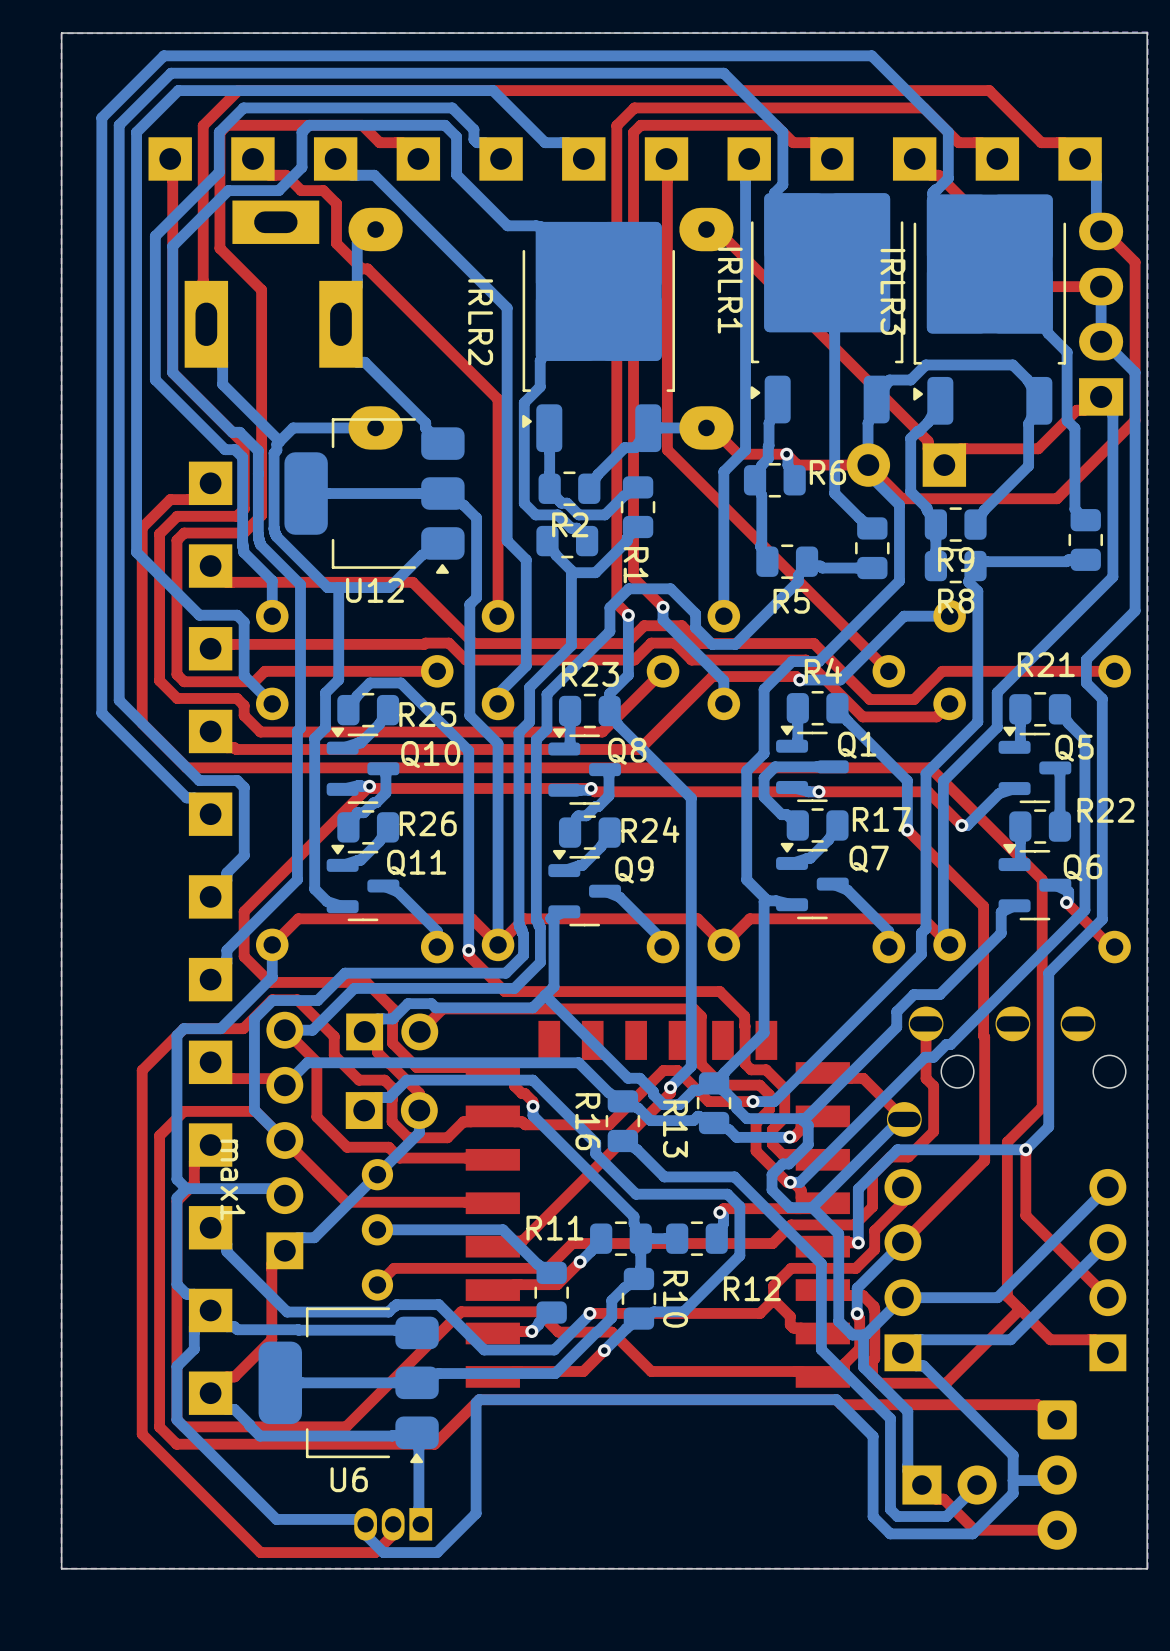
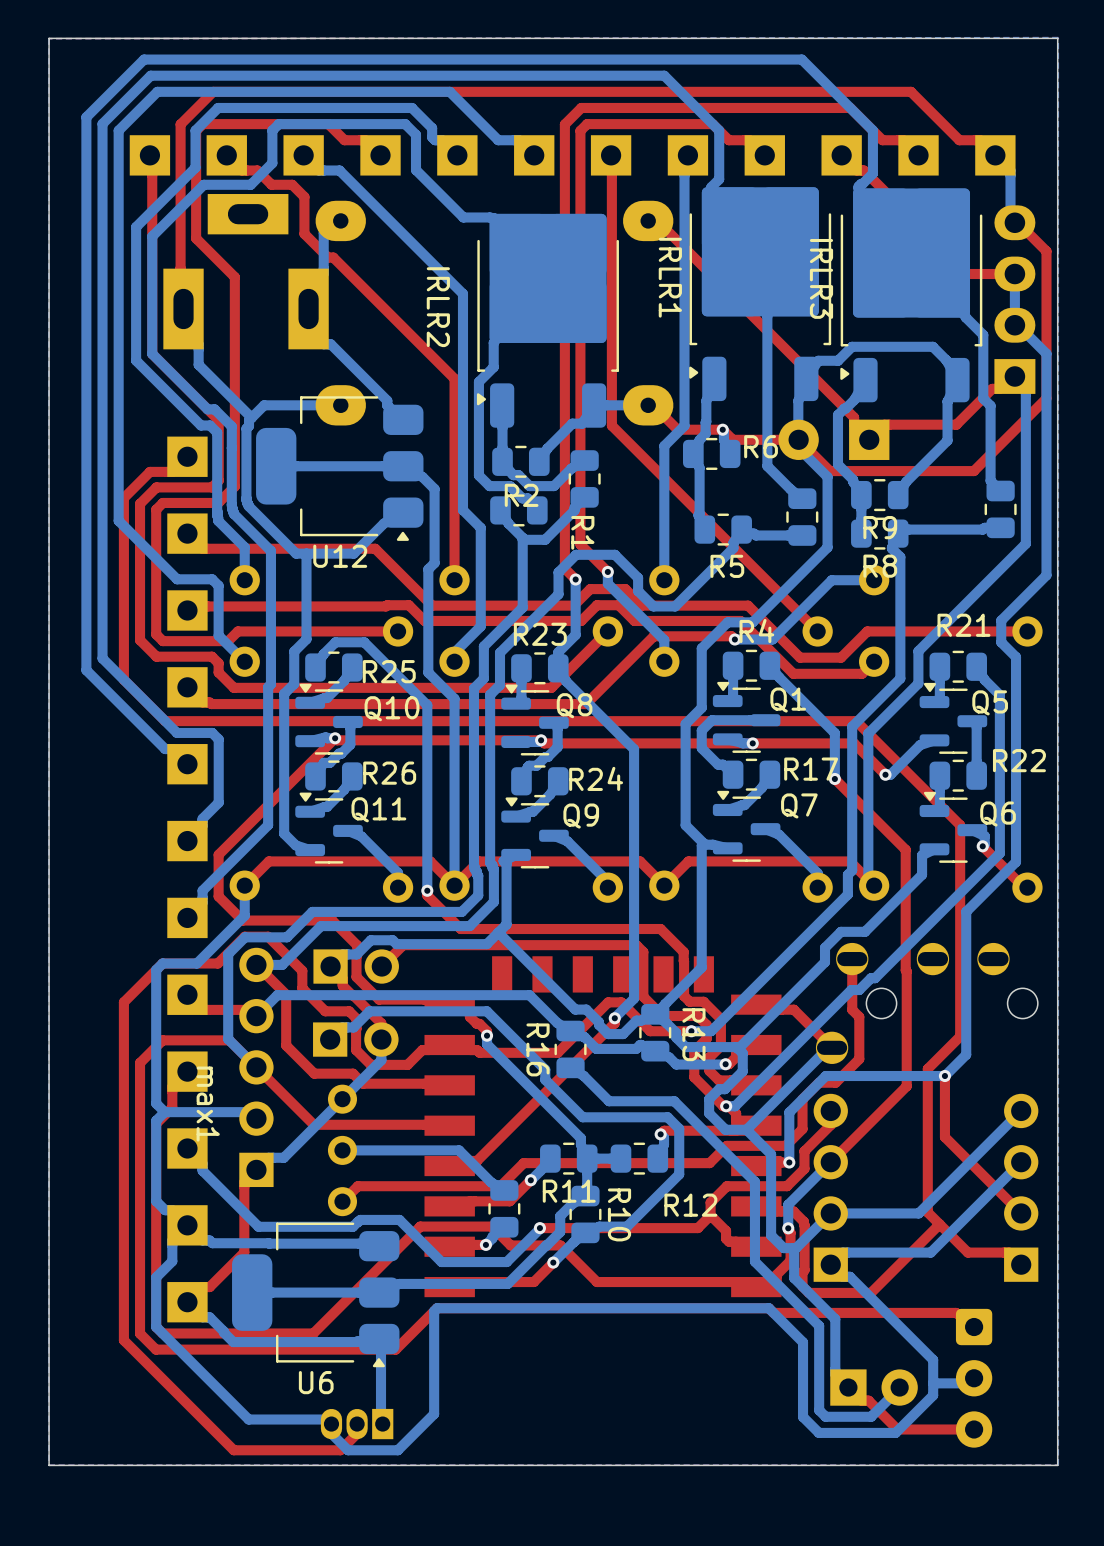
R13 name position: R13 (675, 1129) -> R13 (693, 1034)
R11 name position: R11 (554, 1228) -> R11 (569, 1191)

